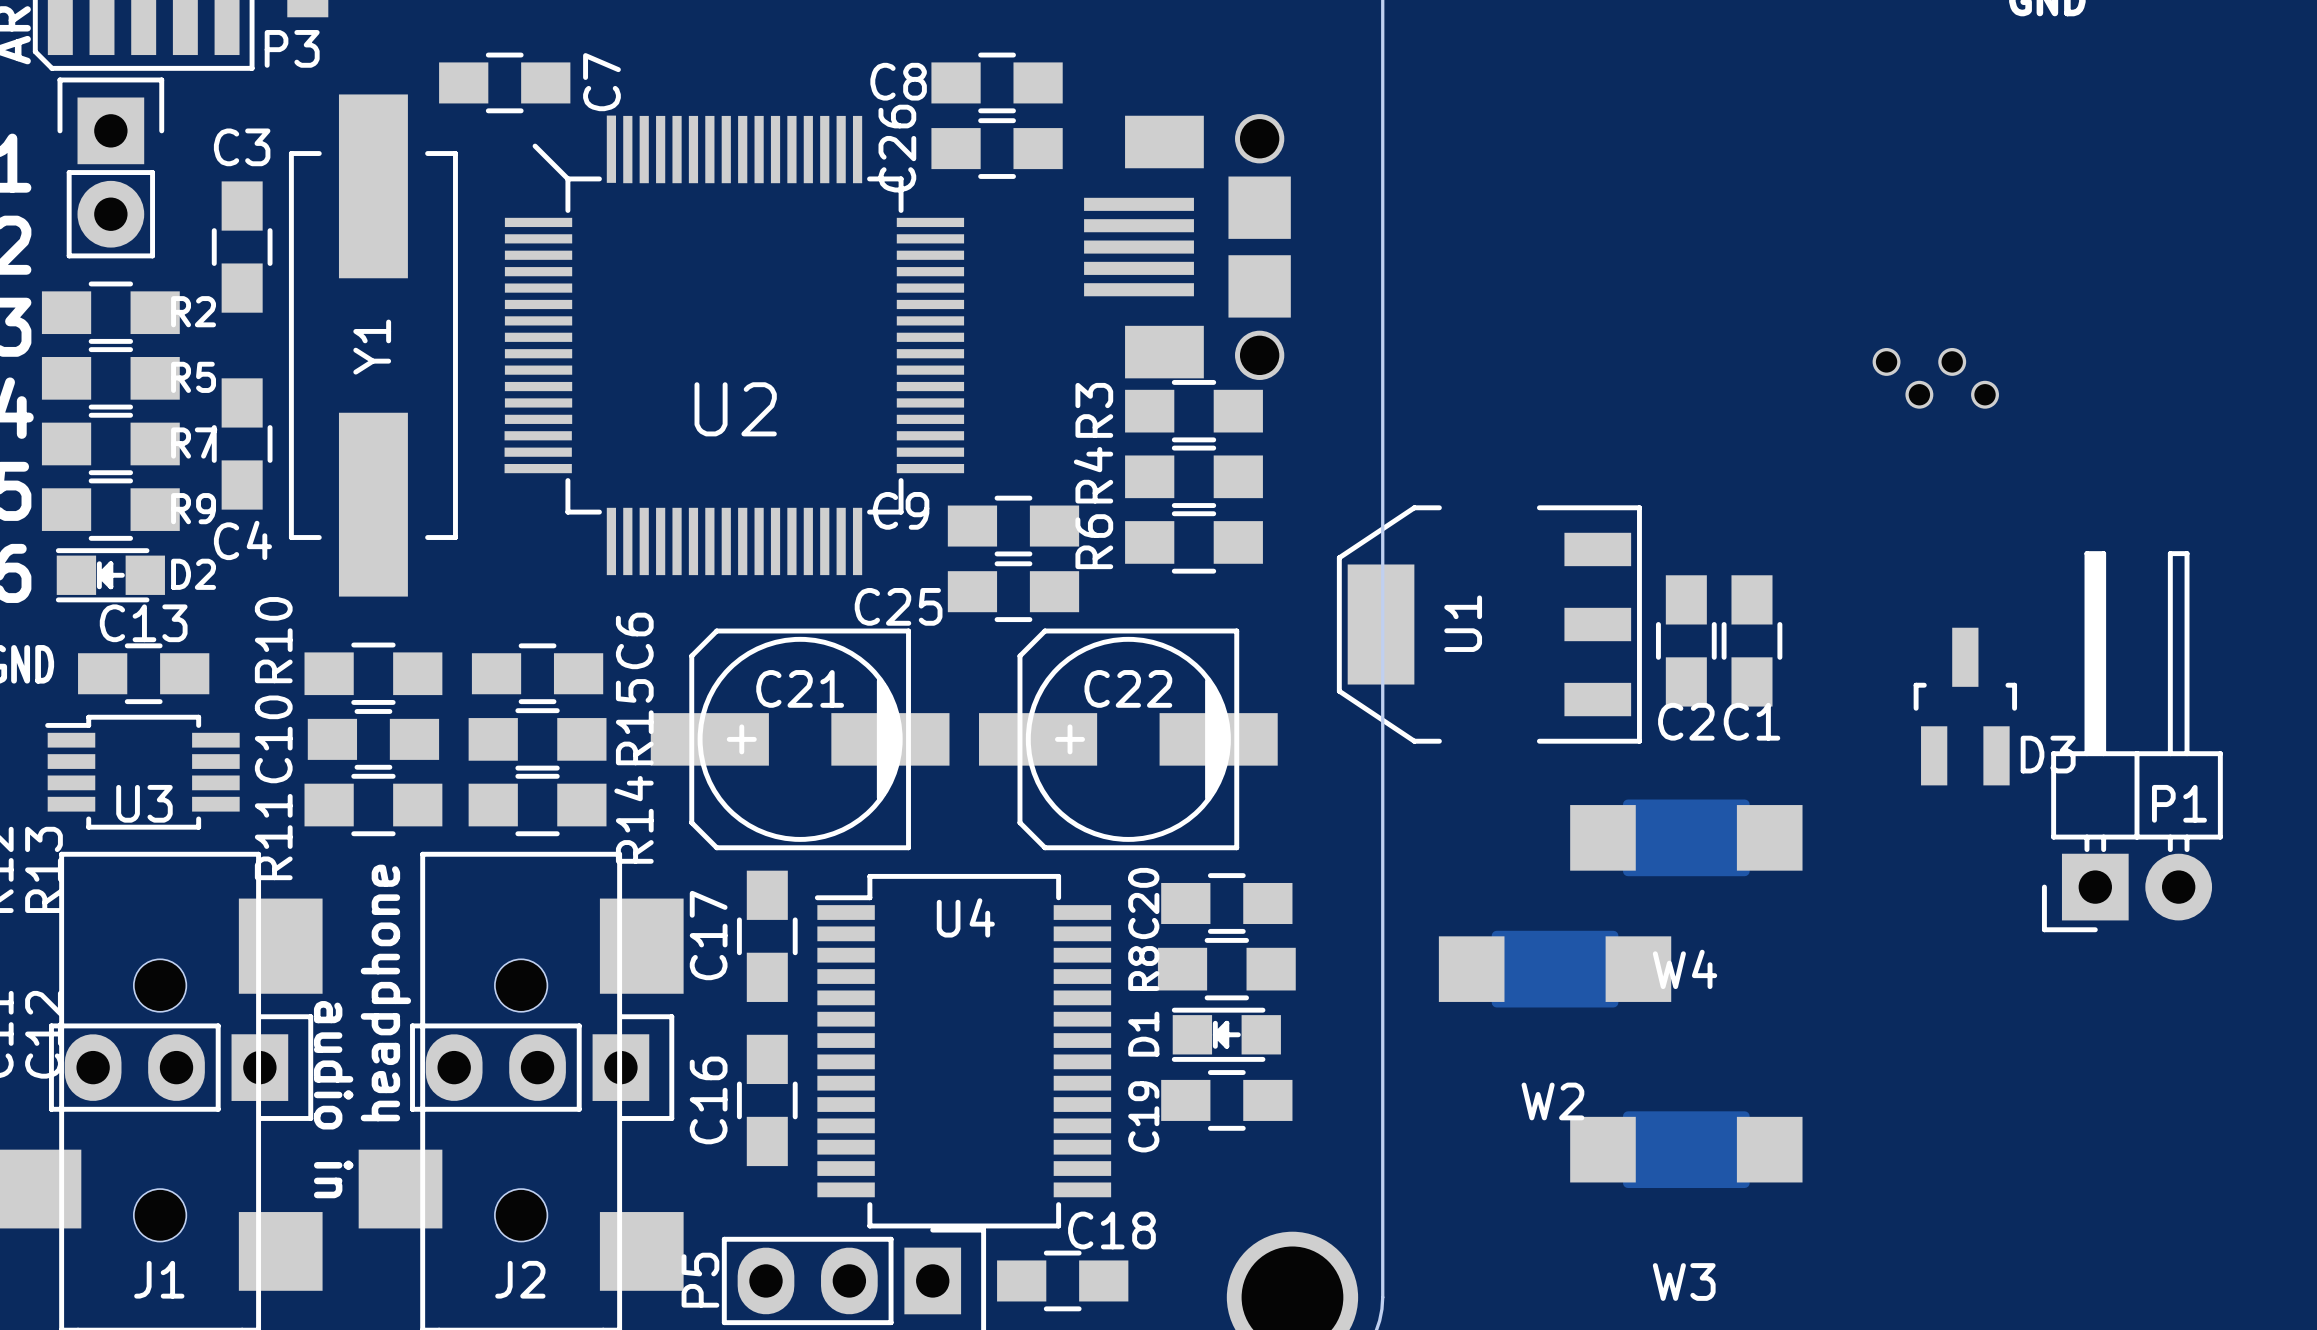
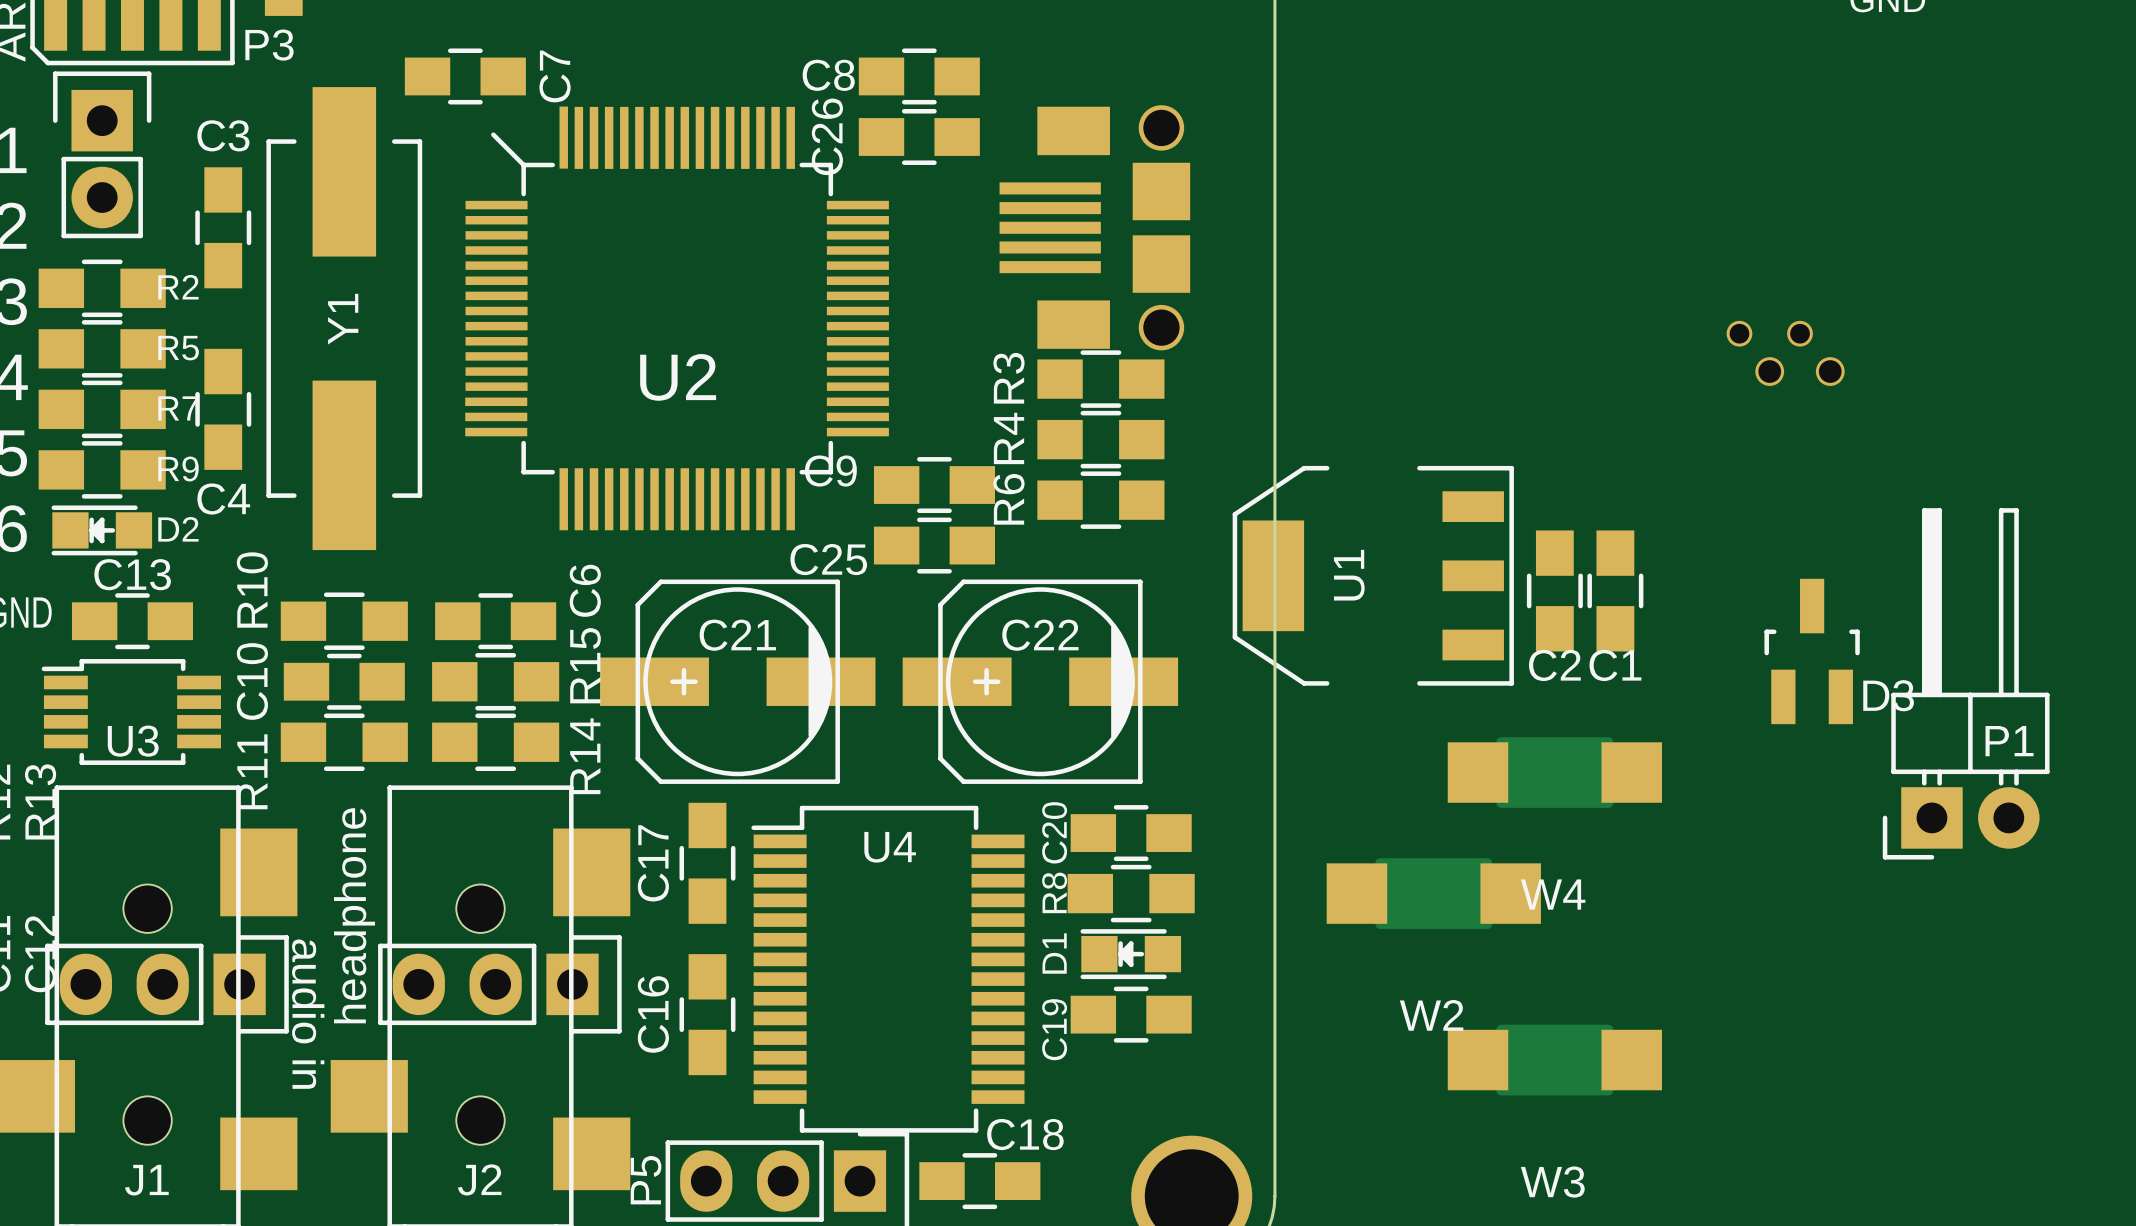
part footprint: [1905, 380, 1934, 409] -> [1755, 357, 1785, 386]
part footprint: [1971, 380, 1999, 409] -> [1815, 357, 1845, 386]

